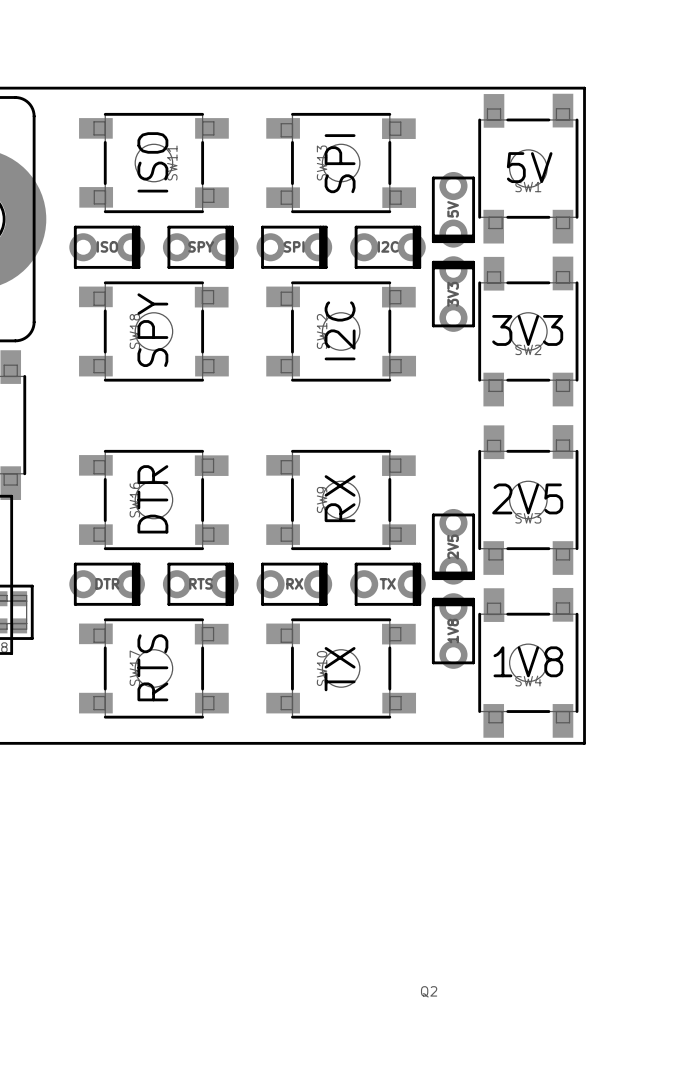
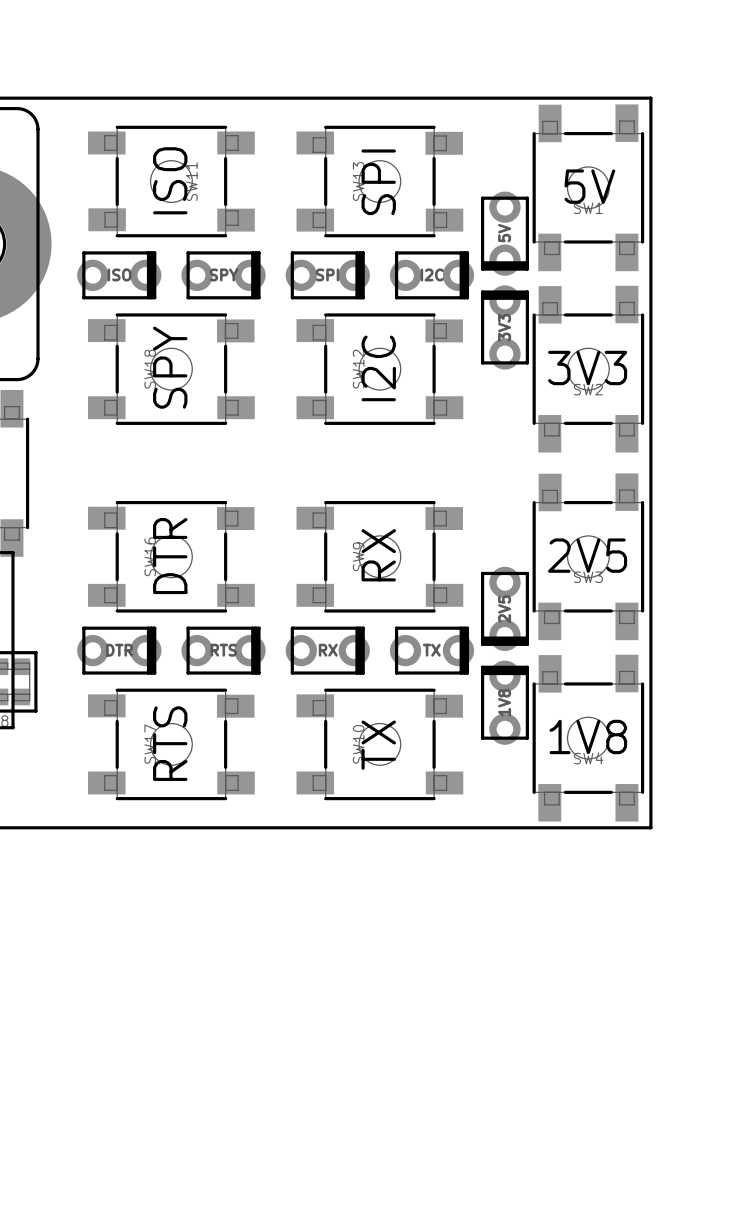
Q2: (429, 991) -> none

